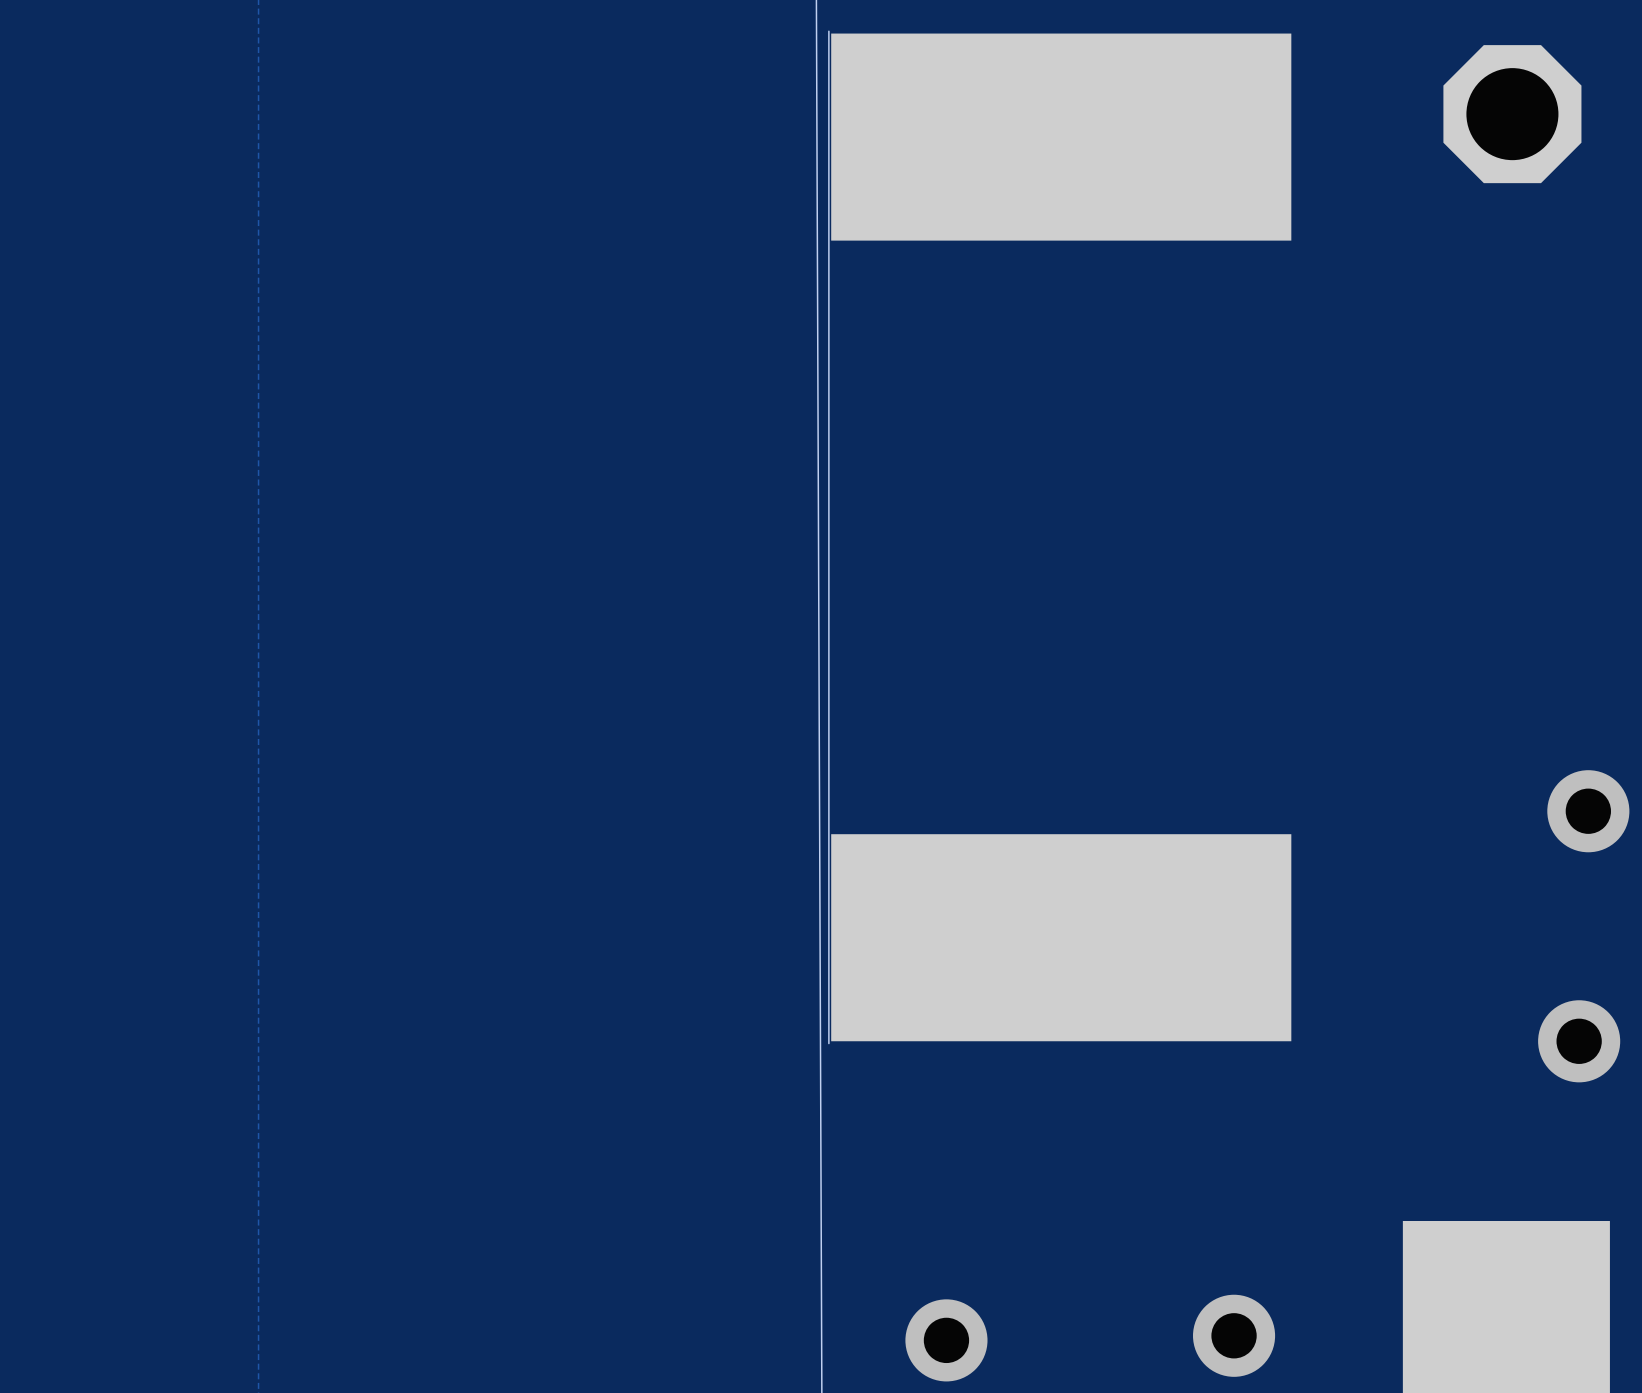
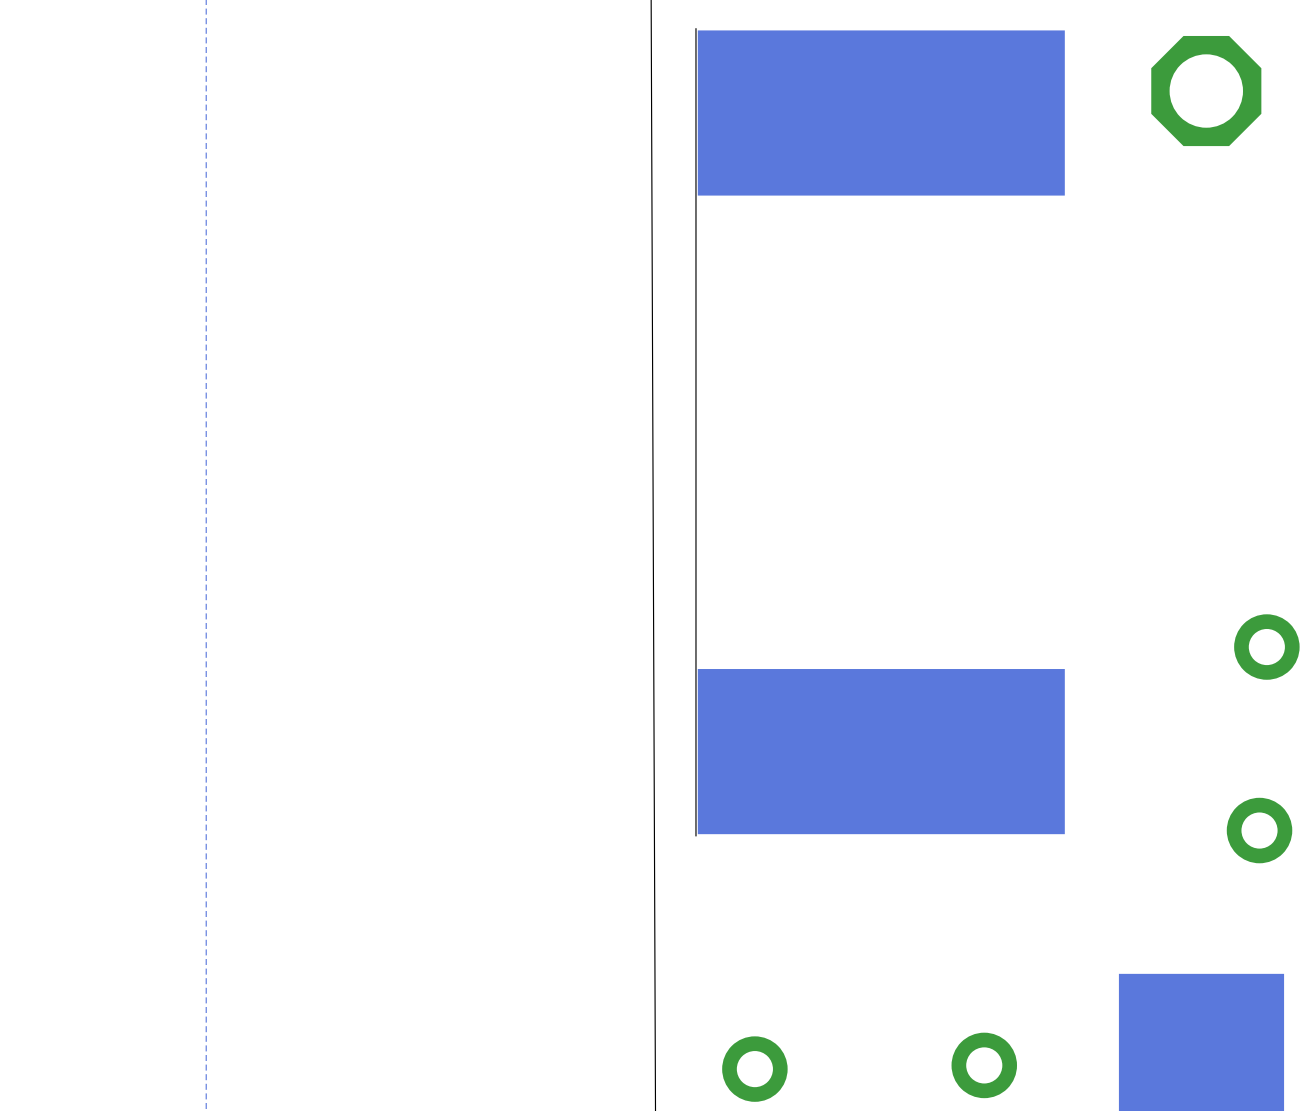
part position: (1060, 537) -> (880, 432)

